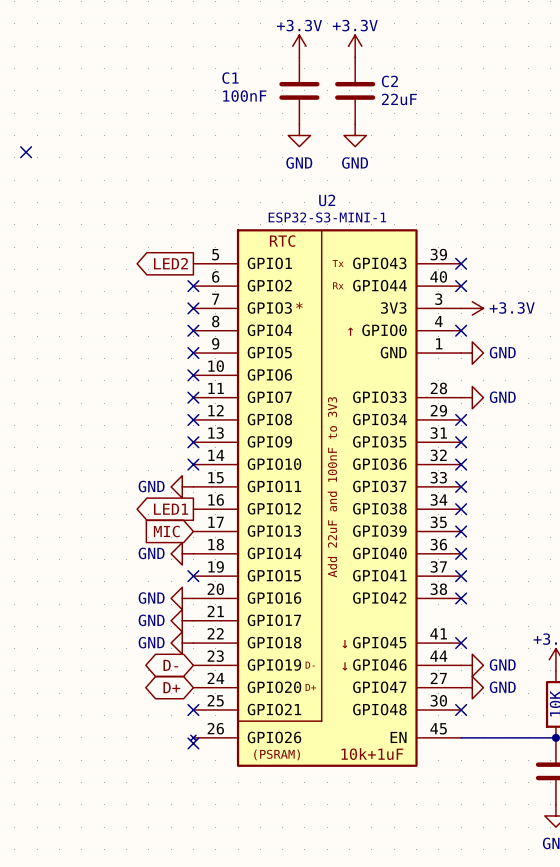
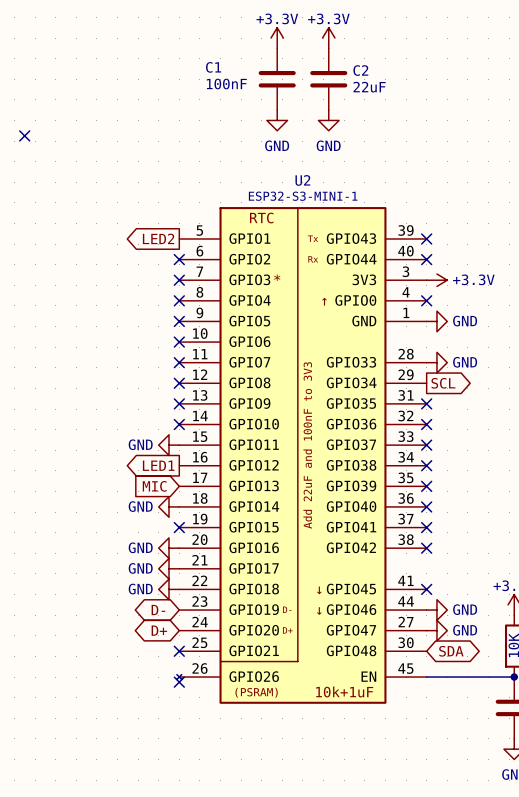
no-connect mark: (461, 419) -> none
global label: none -> SCL (443, 383)
no-connect mark: (461, 709) -> none
global label: none -> SDA (451, 651)

